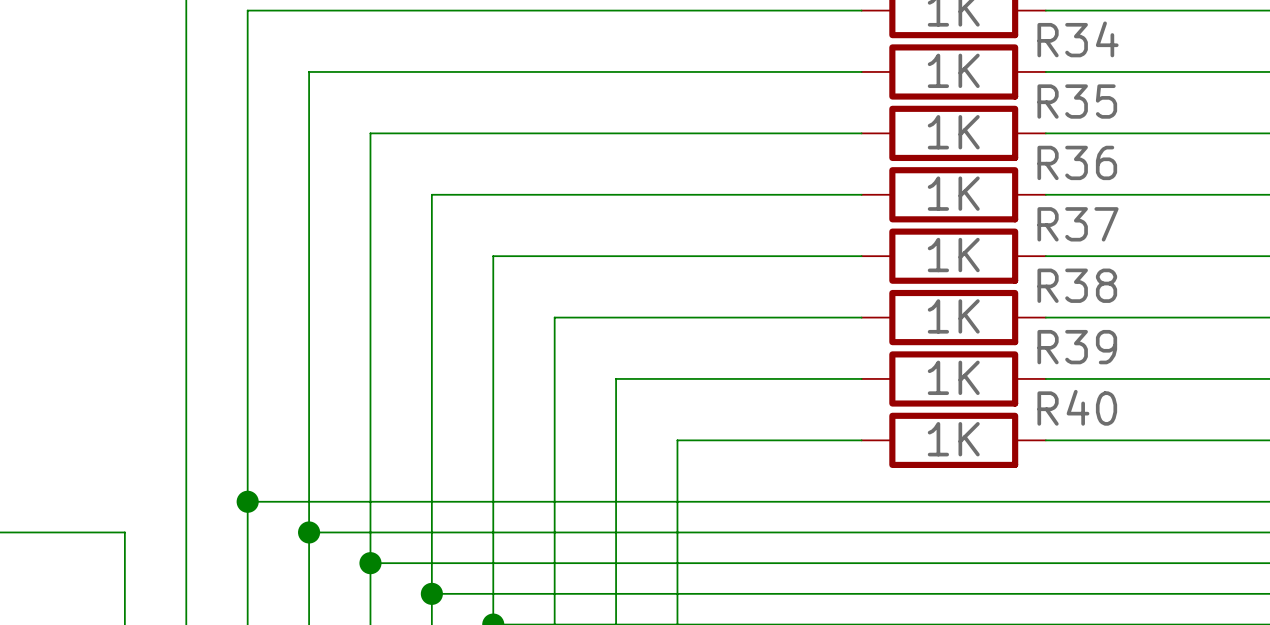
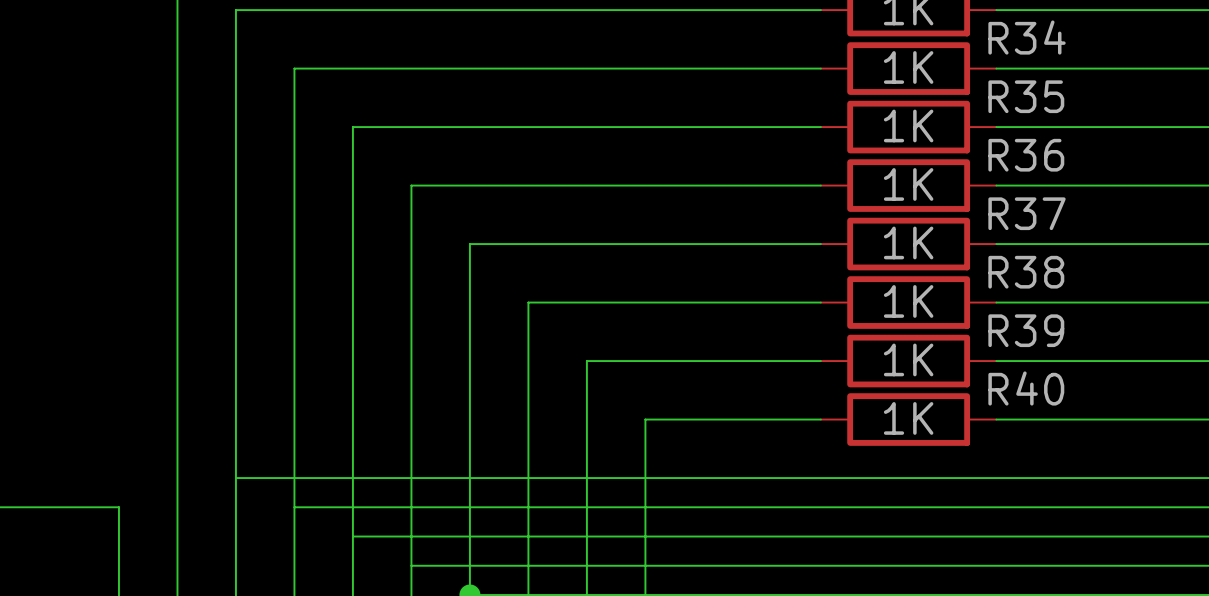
junction: (247, 501) -> none
junction: (309, 532) -> none
junction: (370, 563) -> none
junction: (431, 593) -> none

